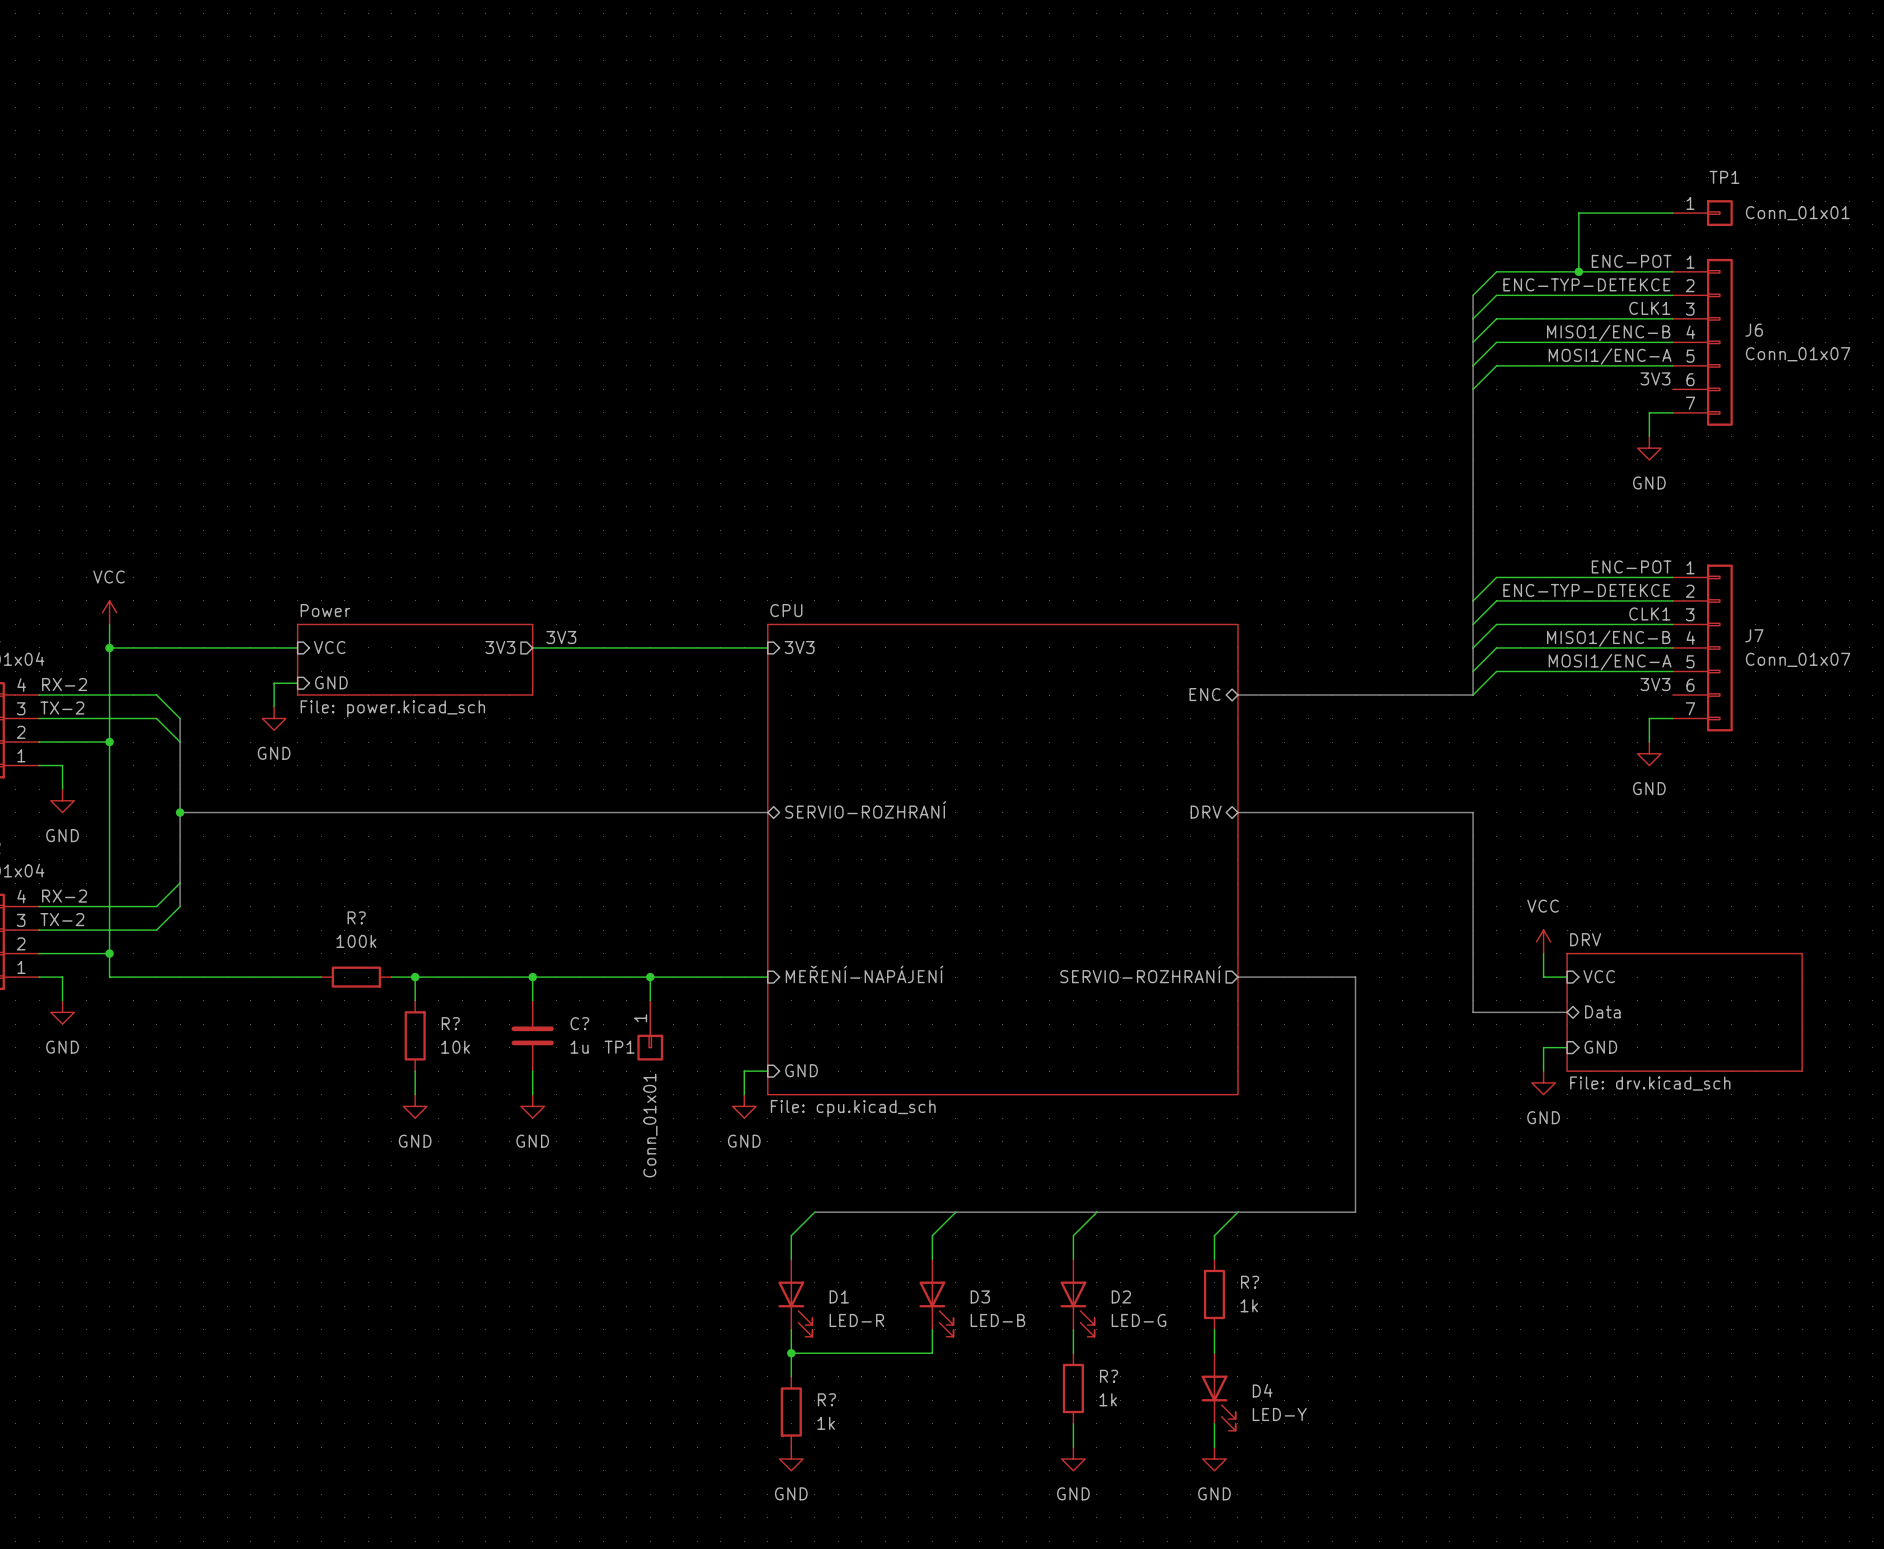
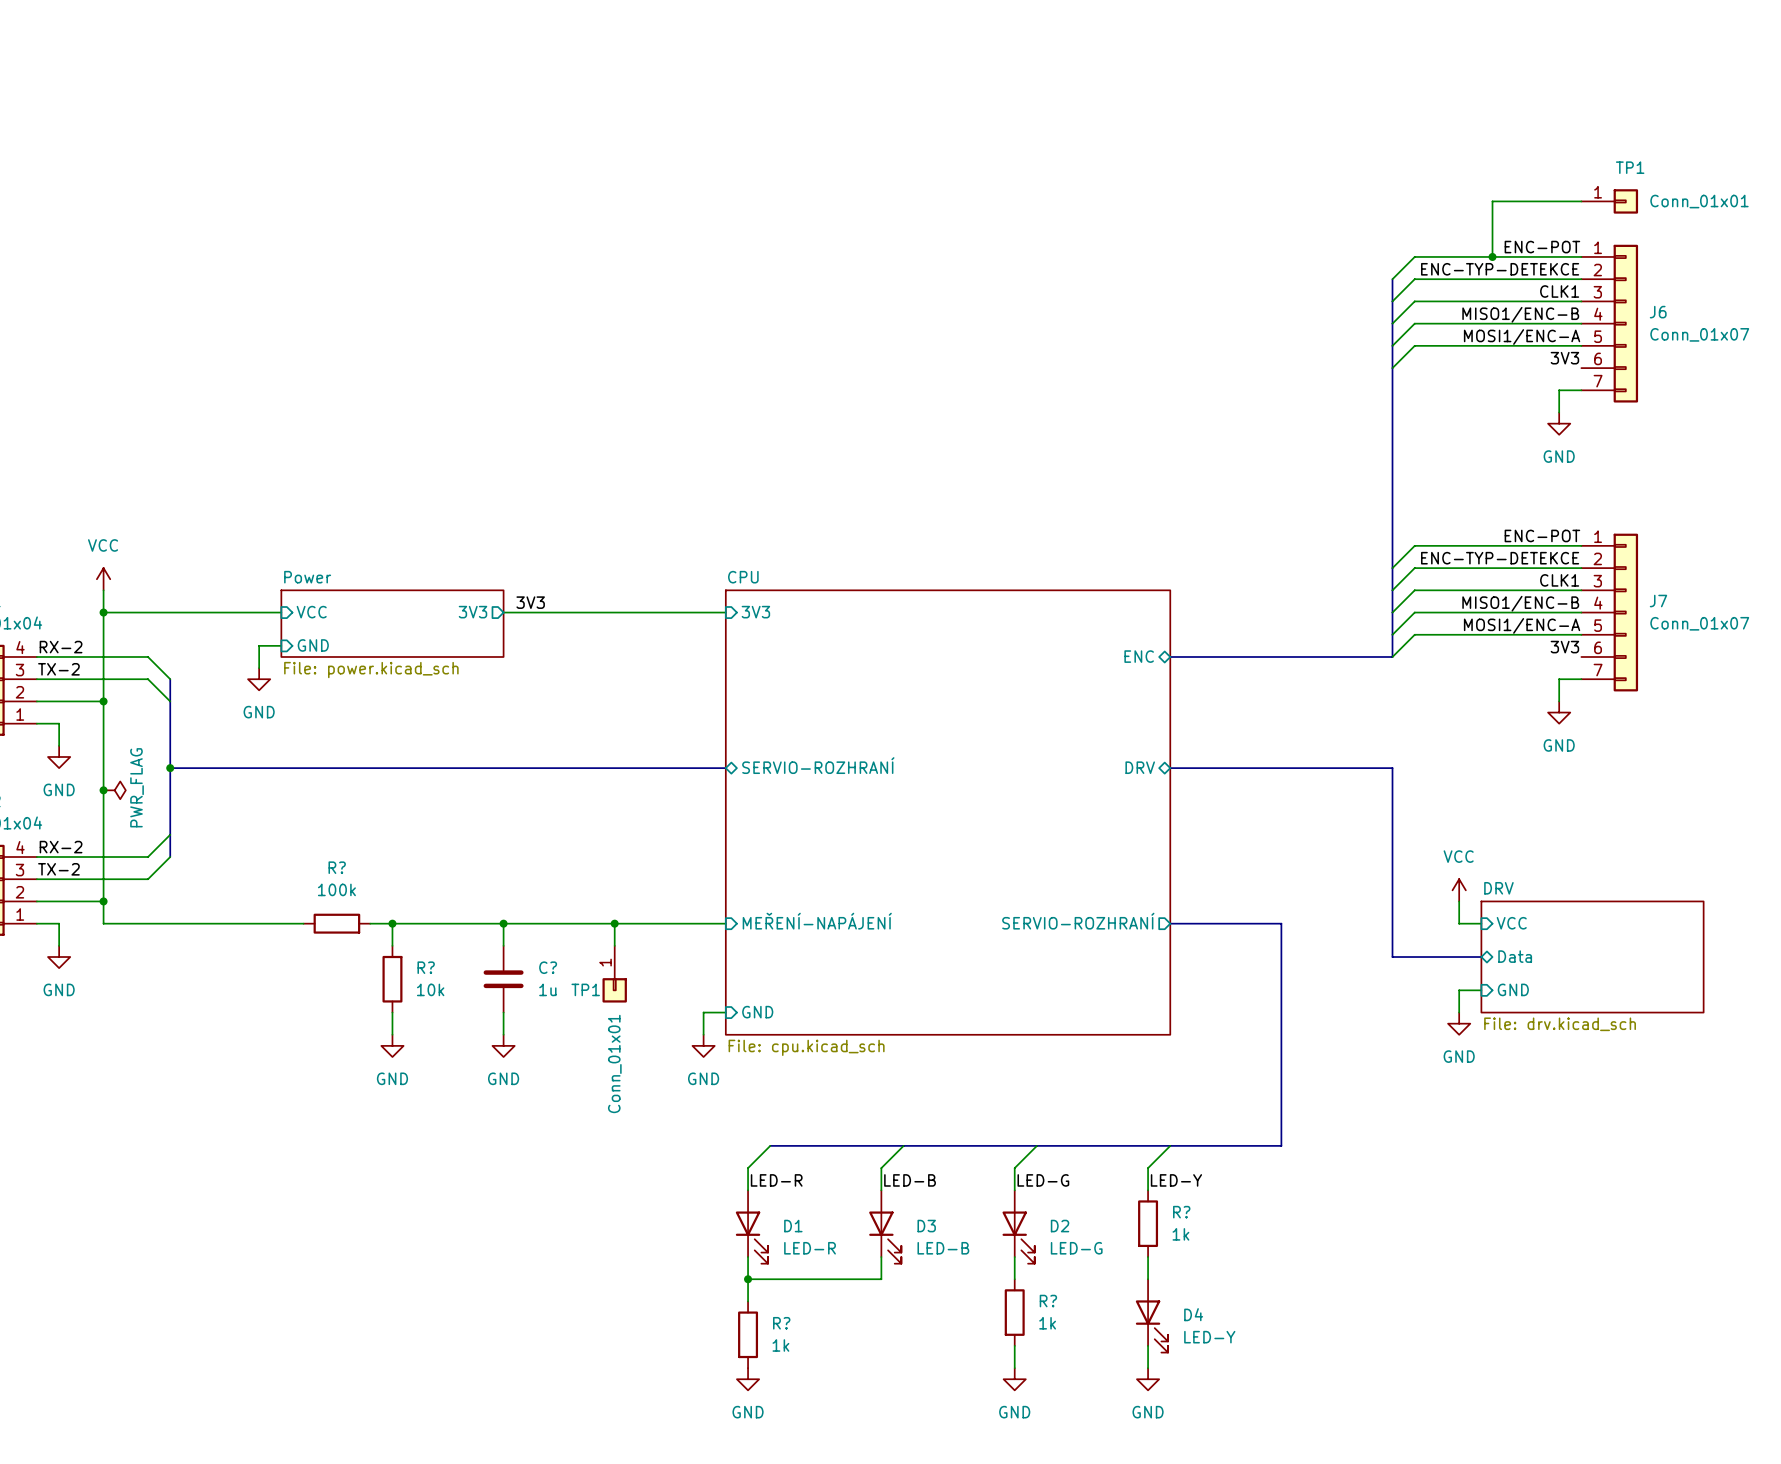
junction: none -> (103, 790)
power symbol: none -> PWR_FLAG (114, 790)
label: none -> LED-R (776, 1180)
label: none -> LED-B (910, 1180)
label: none -> LED-G (1043, 1180)
label: none -> LED-Y (1176, 1180)

